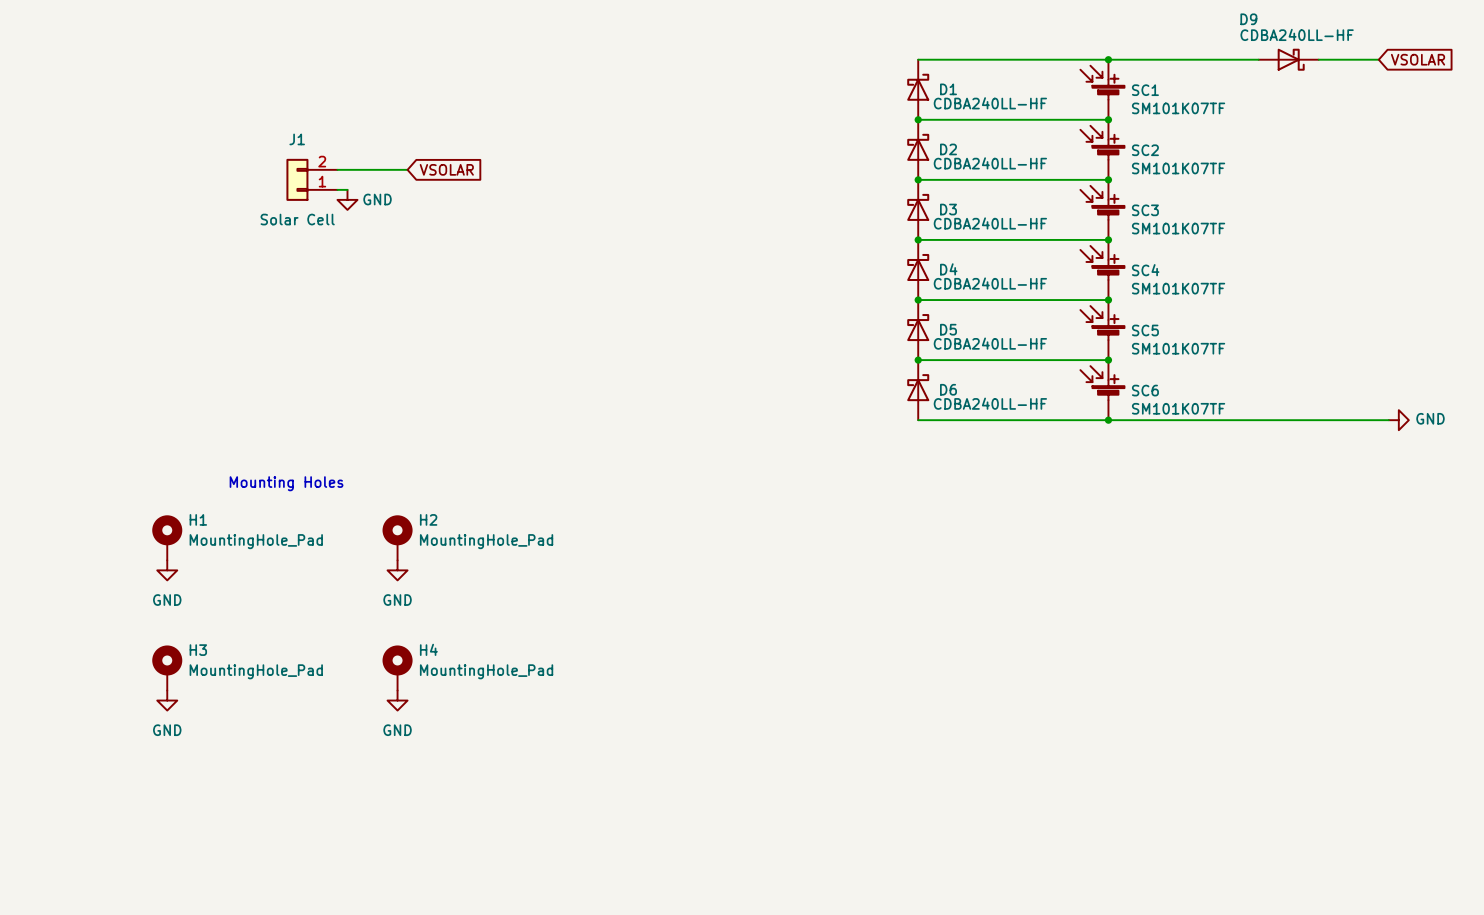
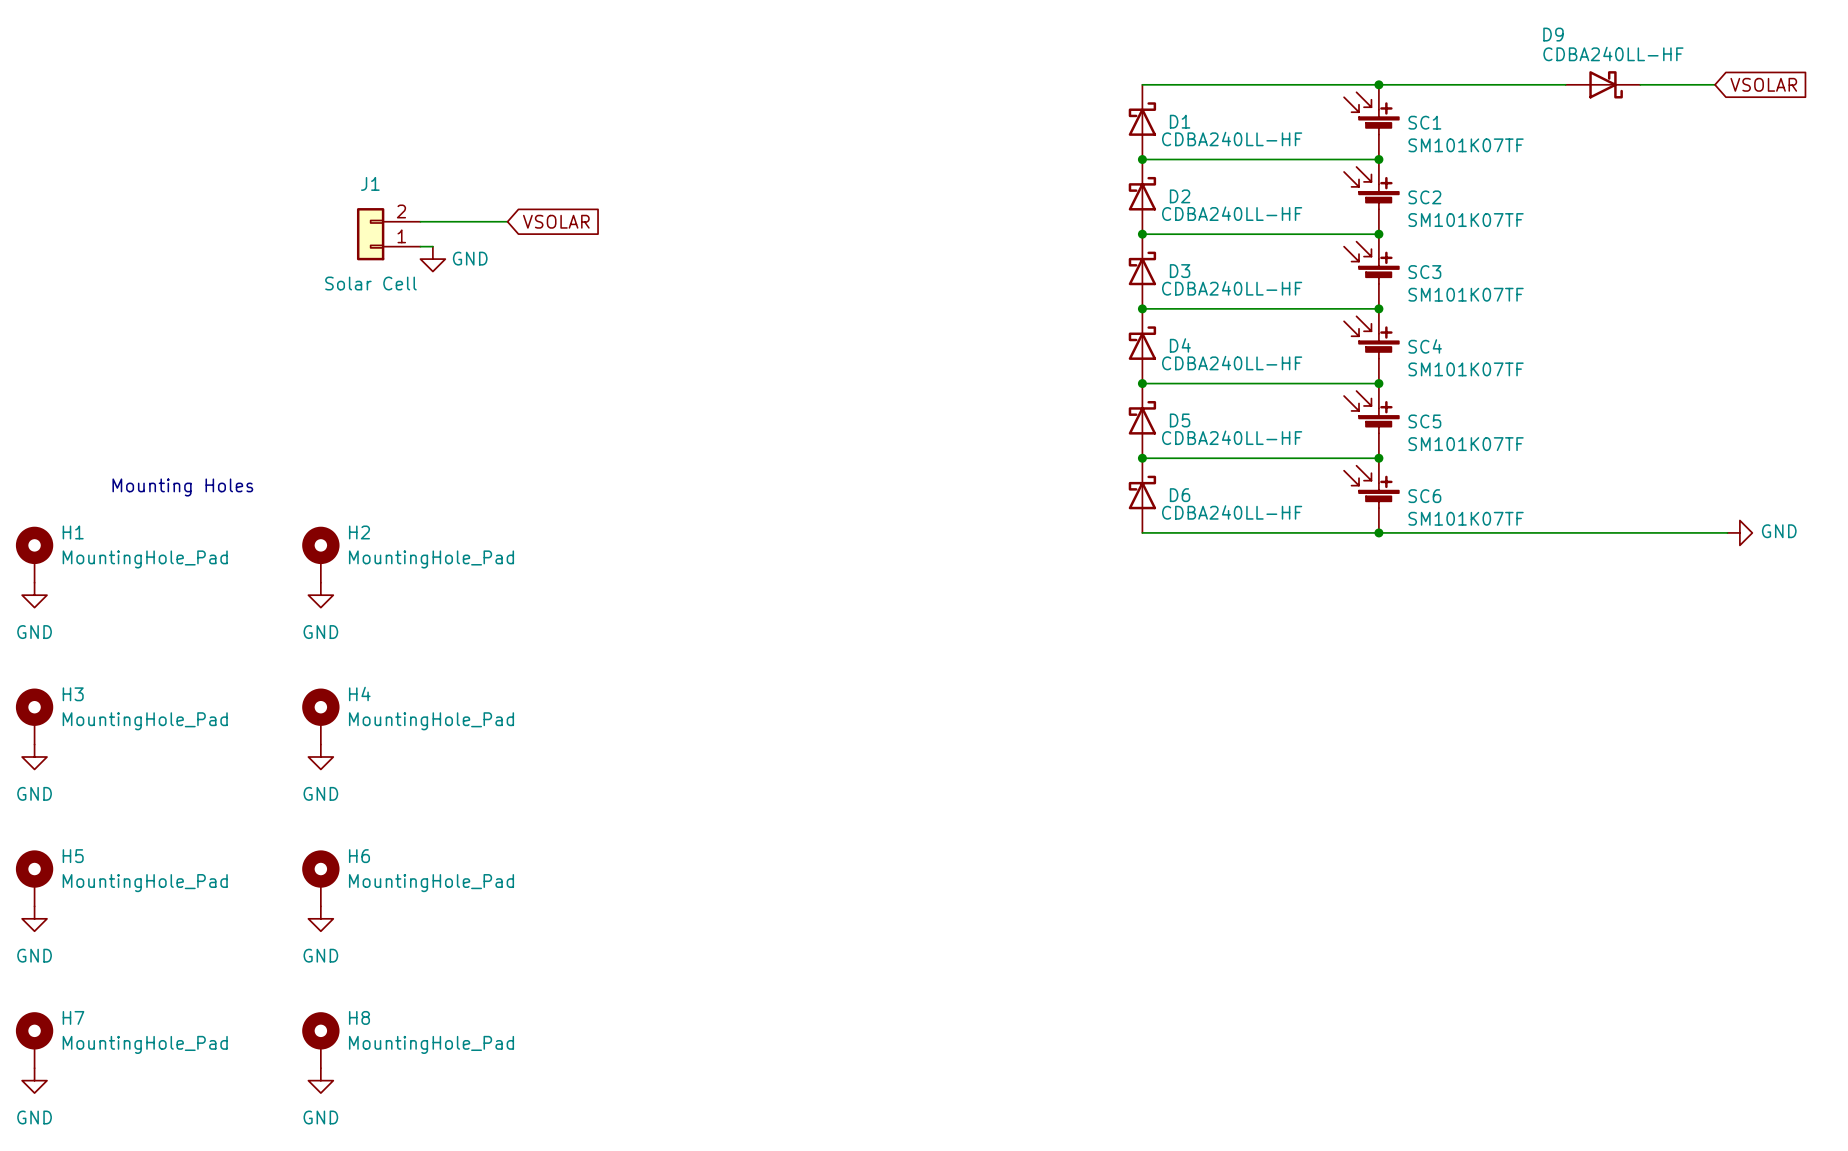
power symbol: none -> GND (34, 595)
power symbol: none -> GND (320, 595)
text position: Mounting Holes (286, 483) -> Mounting Holes (182, 487)
H1 position: (167, 537) -> (34, 554)
H2 position: (397, 537) -> (320, 554)
power symbol: GND (167, 570) -> none
power symbol: GND (397, 570) -> none
power symbol: none -> GND (34, 757)
power symbol: none -> GND (320, 757)
H3 position: (167, 667) -> (34, 716)
H4 position: (397, 667) -> (320, 716)
H5: none -> MountingHole_Pad (34, 878)
H6: none -> MountingHole_Pad (320, 878)
power symbol: GND (167, 700) -> none
power symbol: GND (397, 700) -> none
power symbol: none -> GND (34, 918)
power symbol: none -> GND (320, 918)
H7: none -> MountingHole_Pad (34, 1040)
H8: none -> MountingHole_Pad (320, 1040)
power symbol: none -> GND (34, 1080)
power symbol: none -> GND (320, 1080)

